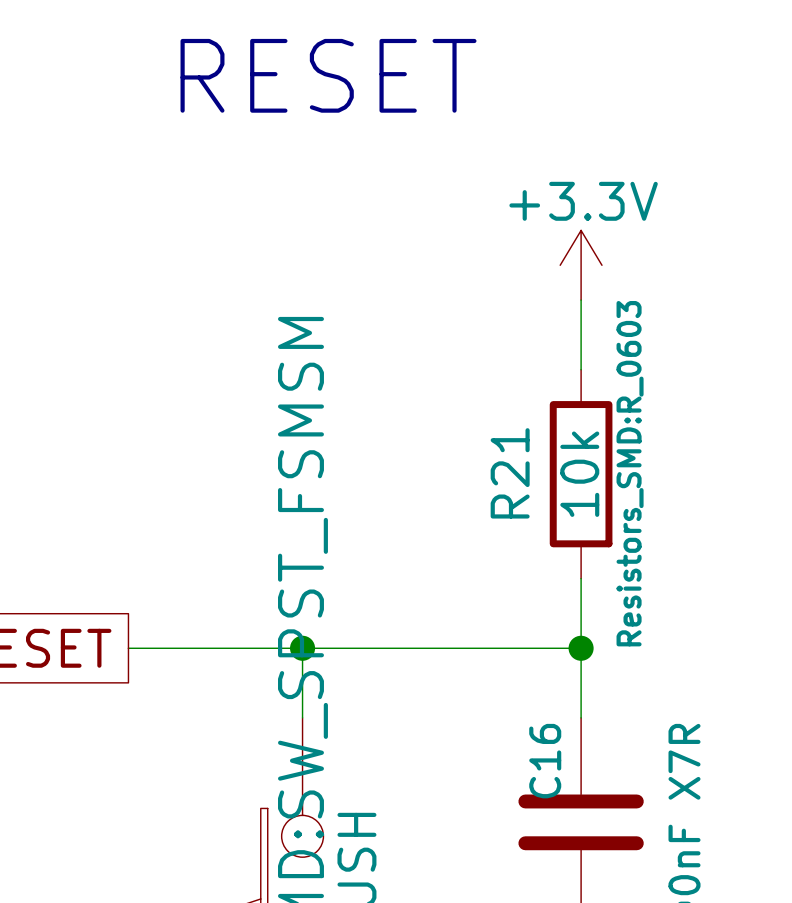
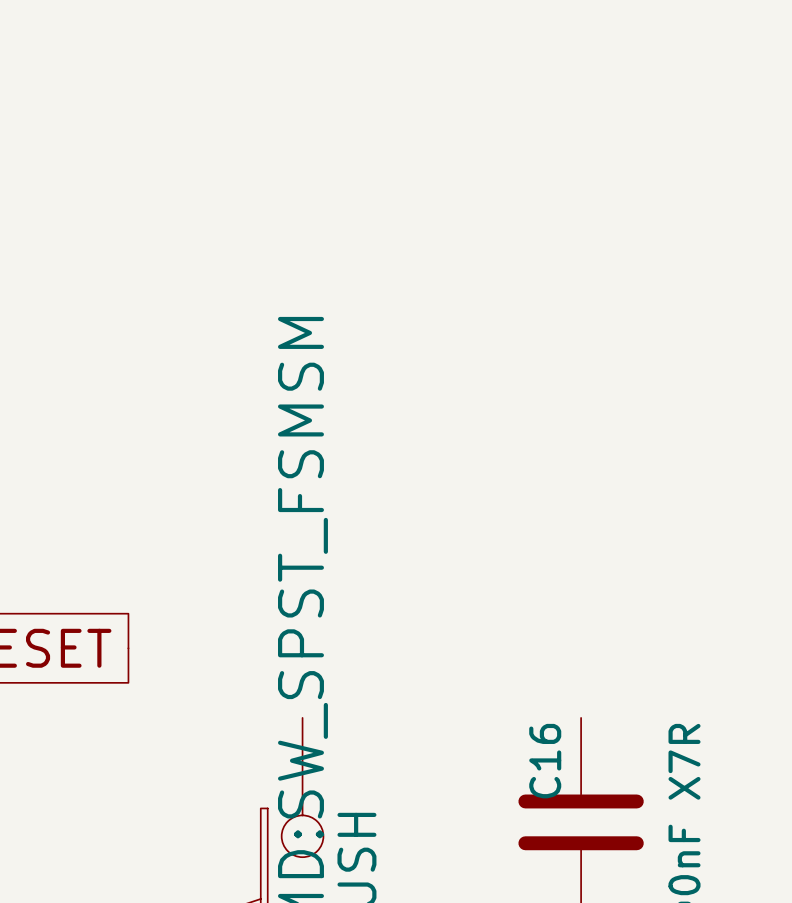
text: RESET (328, 75) -> none
power symbol: +3.3V (581, 265) -> none
wire: (581, 300) (581, 369) -> none
R21: 10k (581, 474) -> none
wire: (581, 578) (581, 717) -> none
wire: (128, 648) (581, 648) -> none
wire: (302, 648) (302, 717) -> none
junction: (302, 648) -> none
junction: (581, 648) -> none

